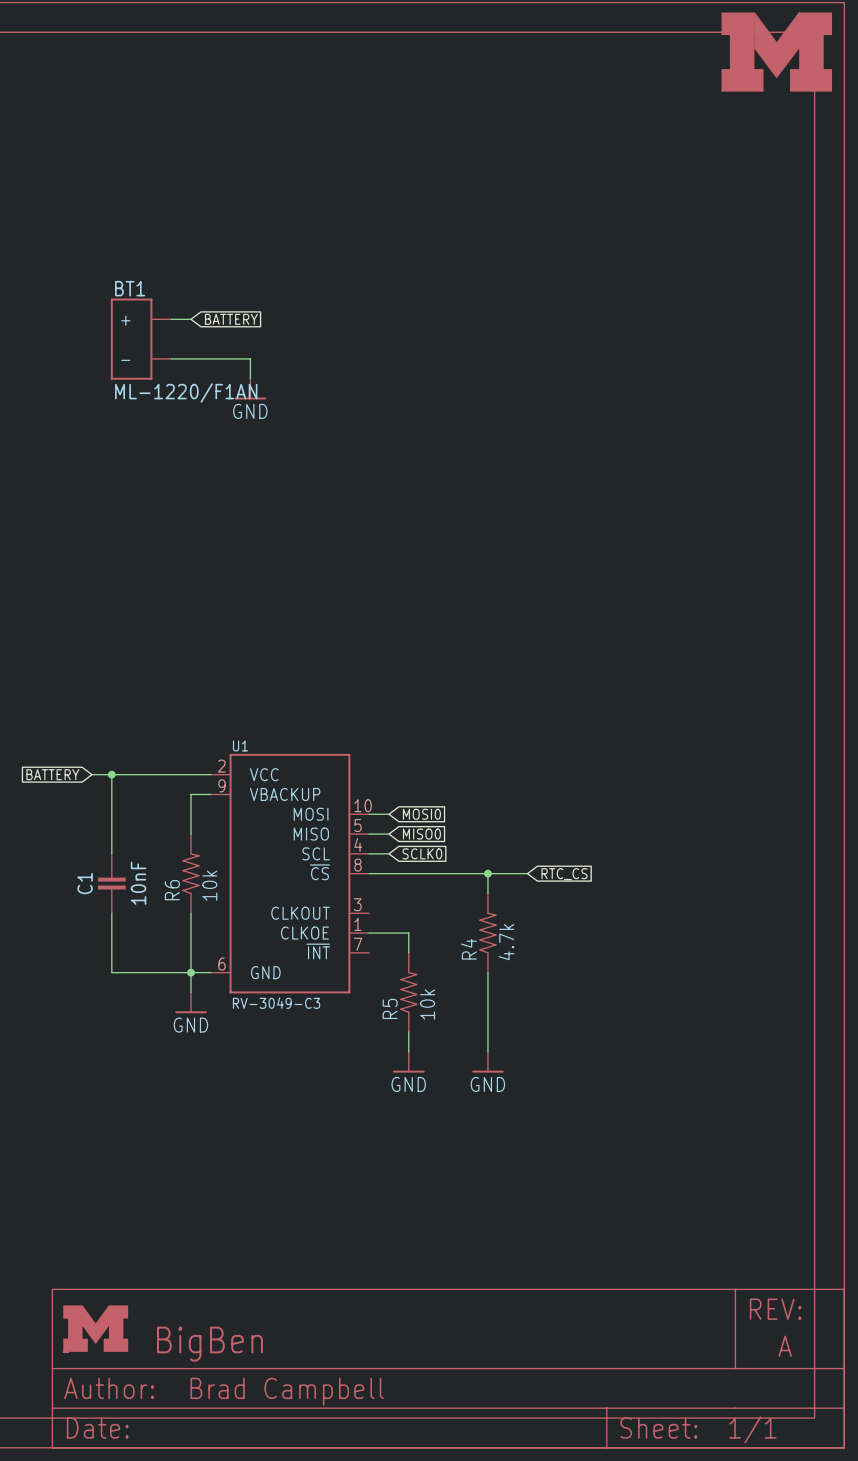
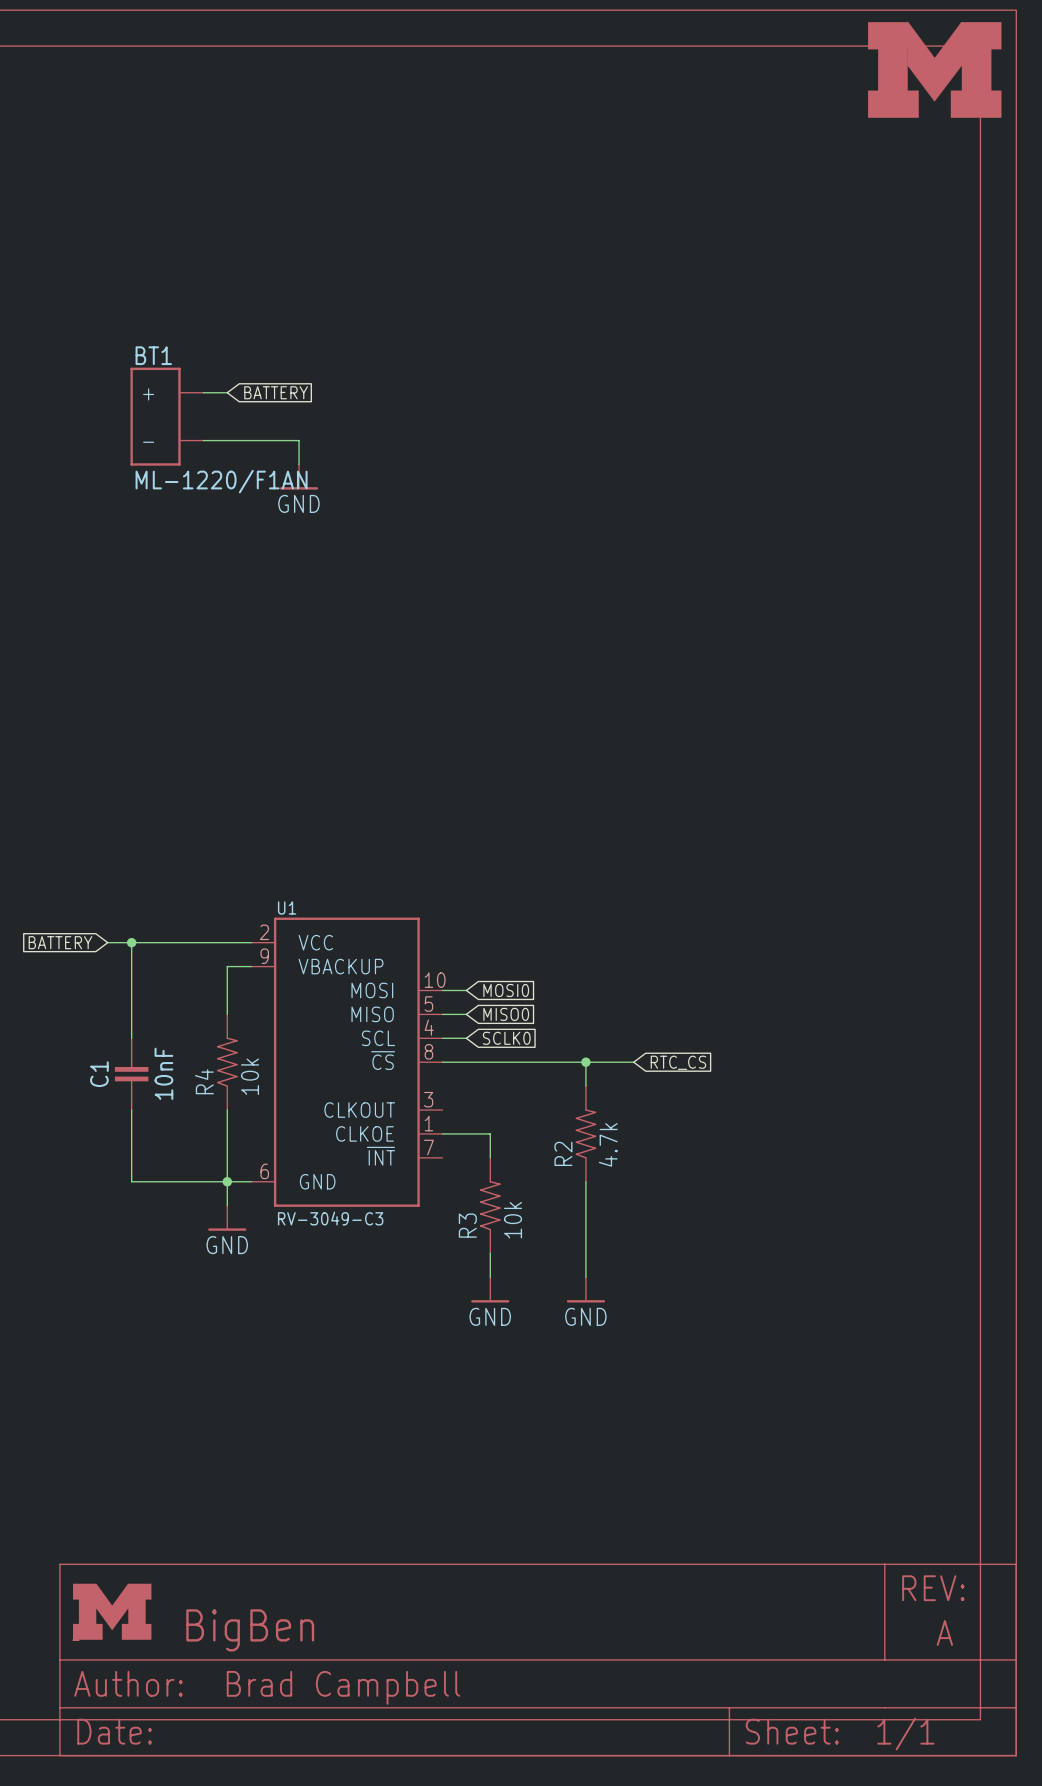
R6 name: R6 (172, 890) -> R4 (204, 1081)
R4 name: R4 (469, 949) -> R2 (563, 1153)
R5 name: R5 (390, 1008) -> R3 (467, 1225)

